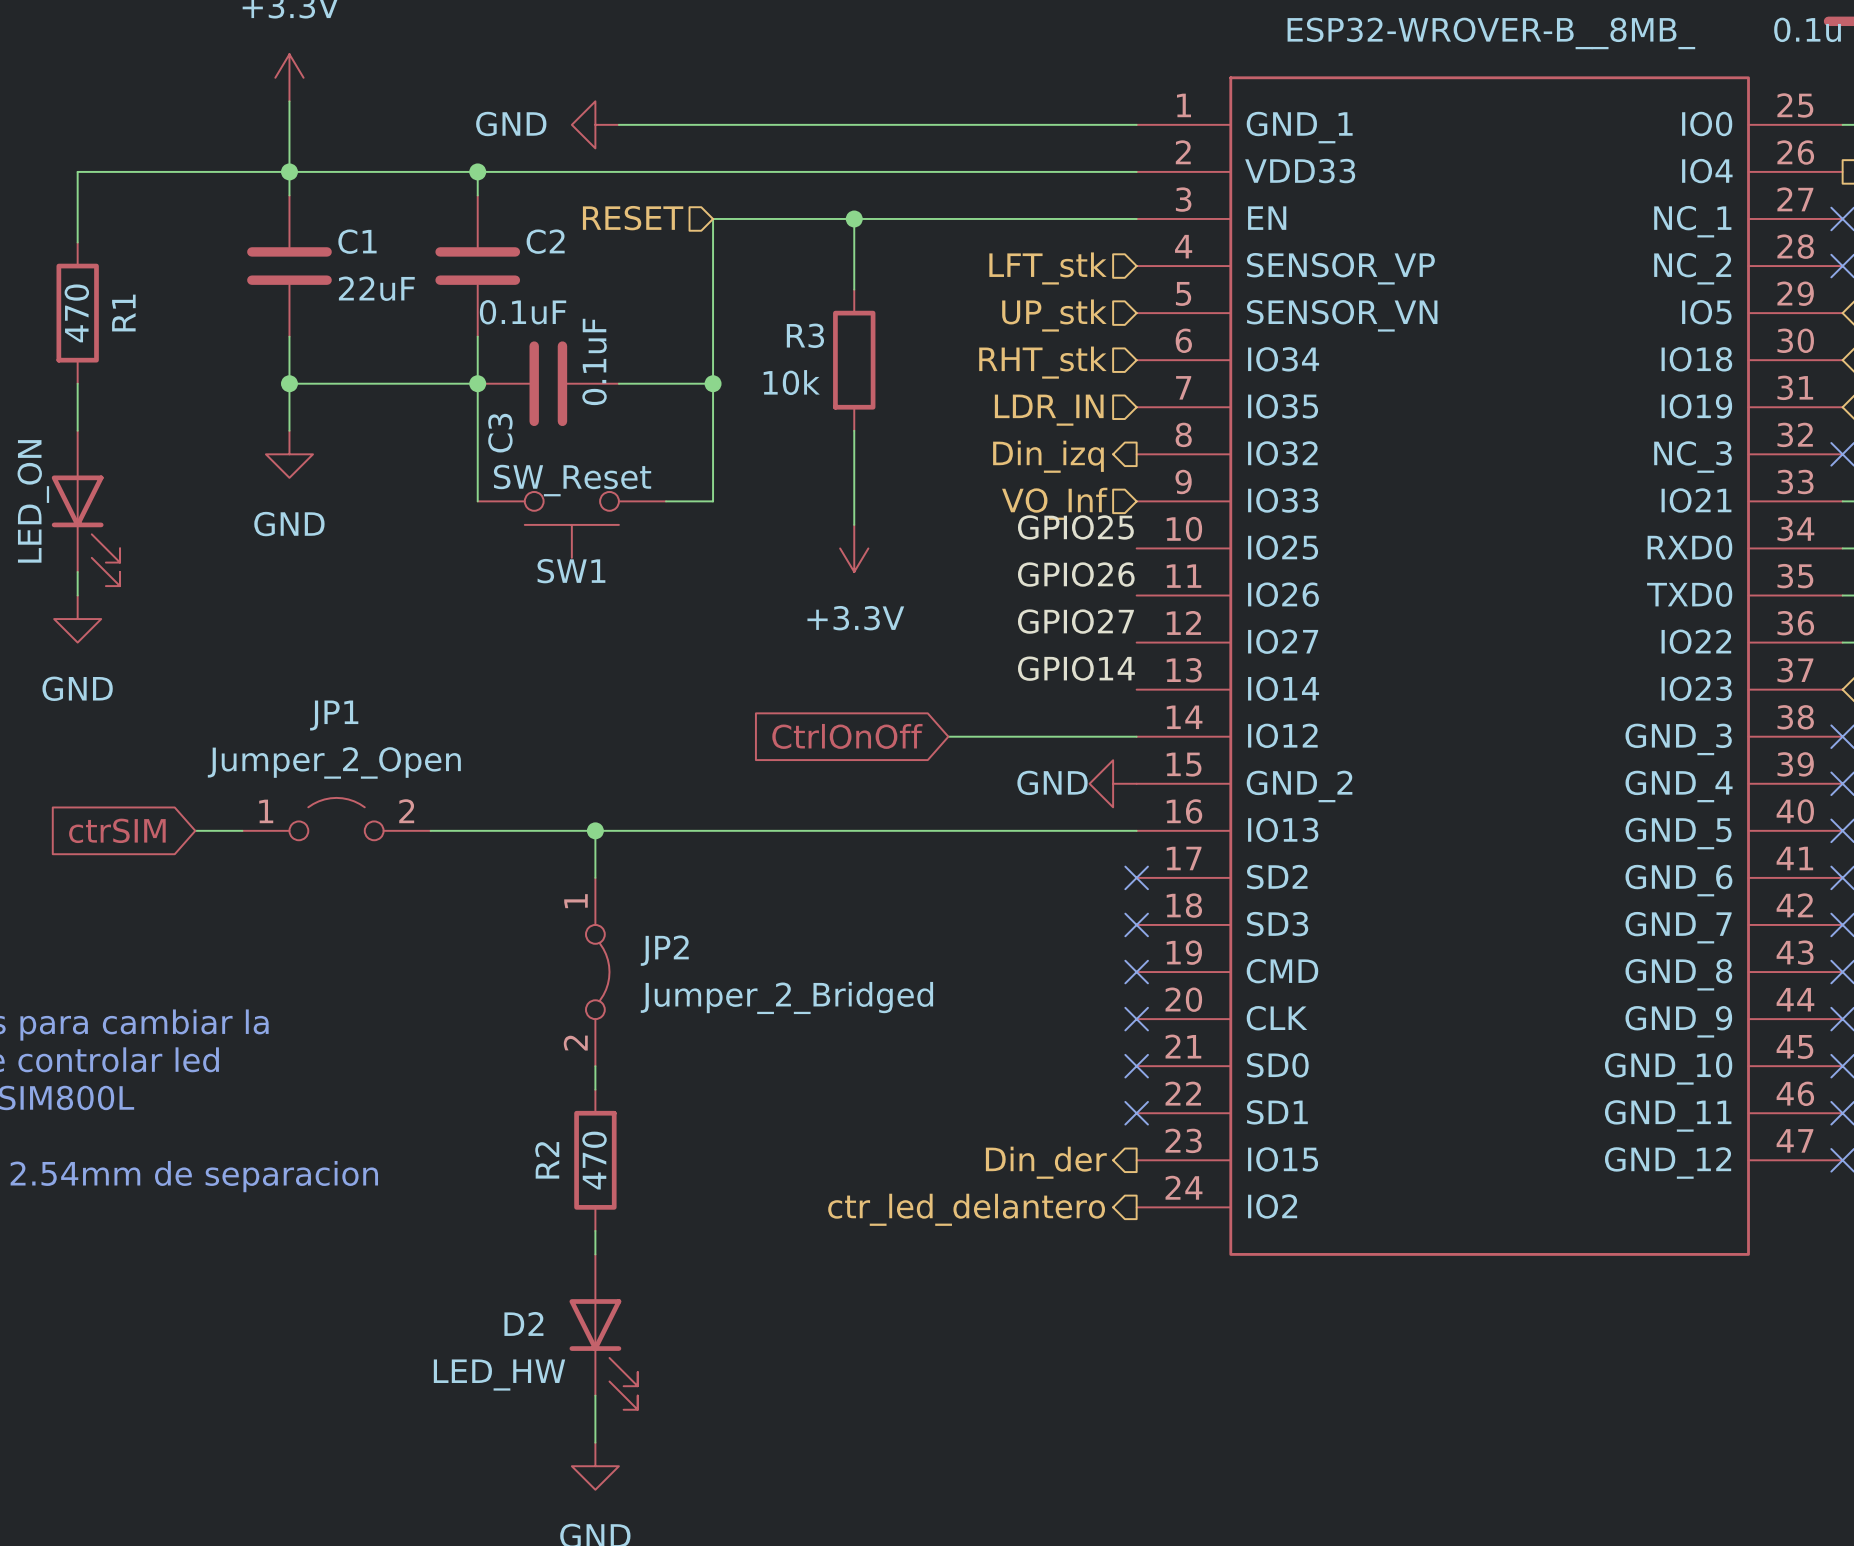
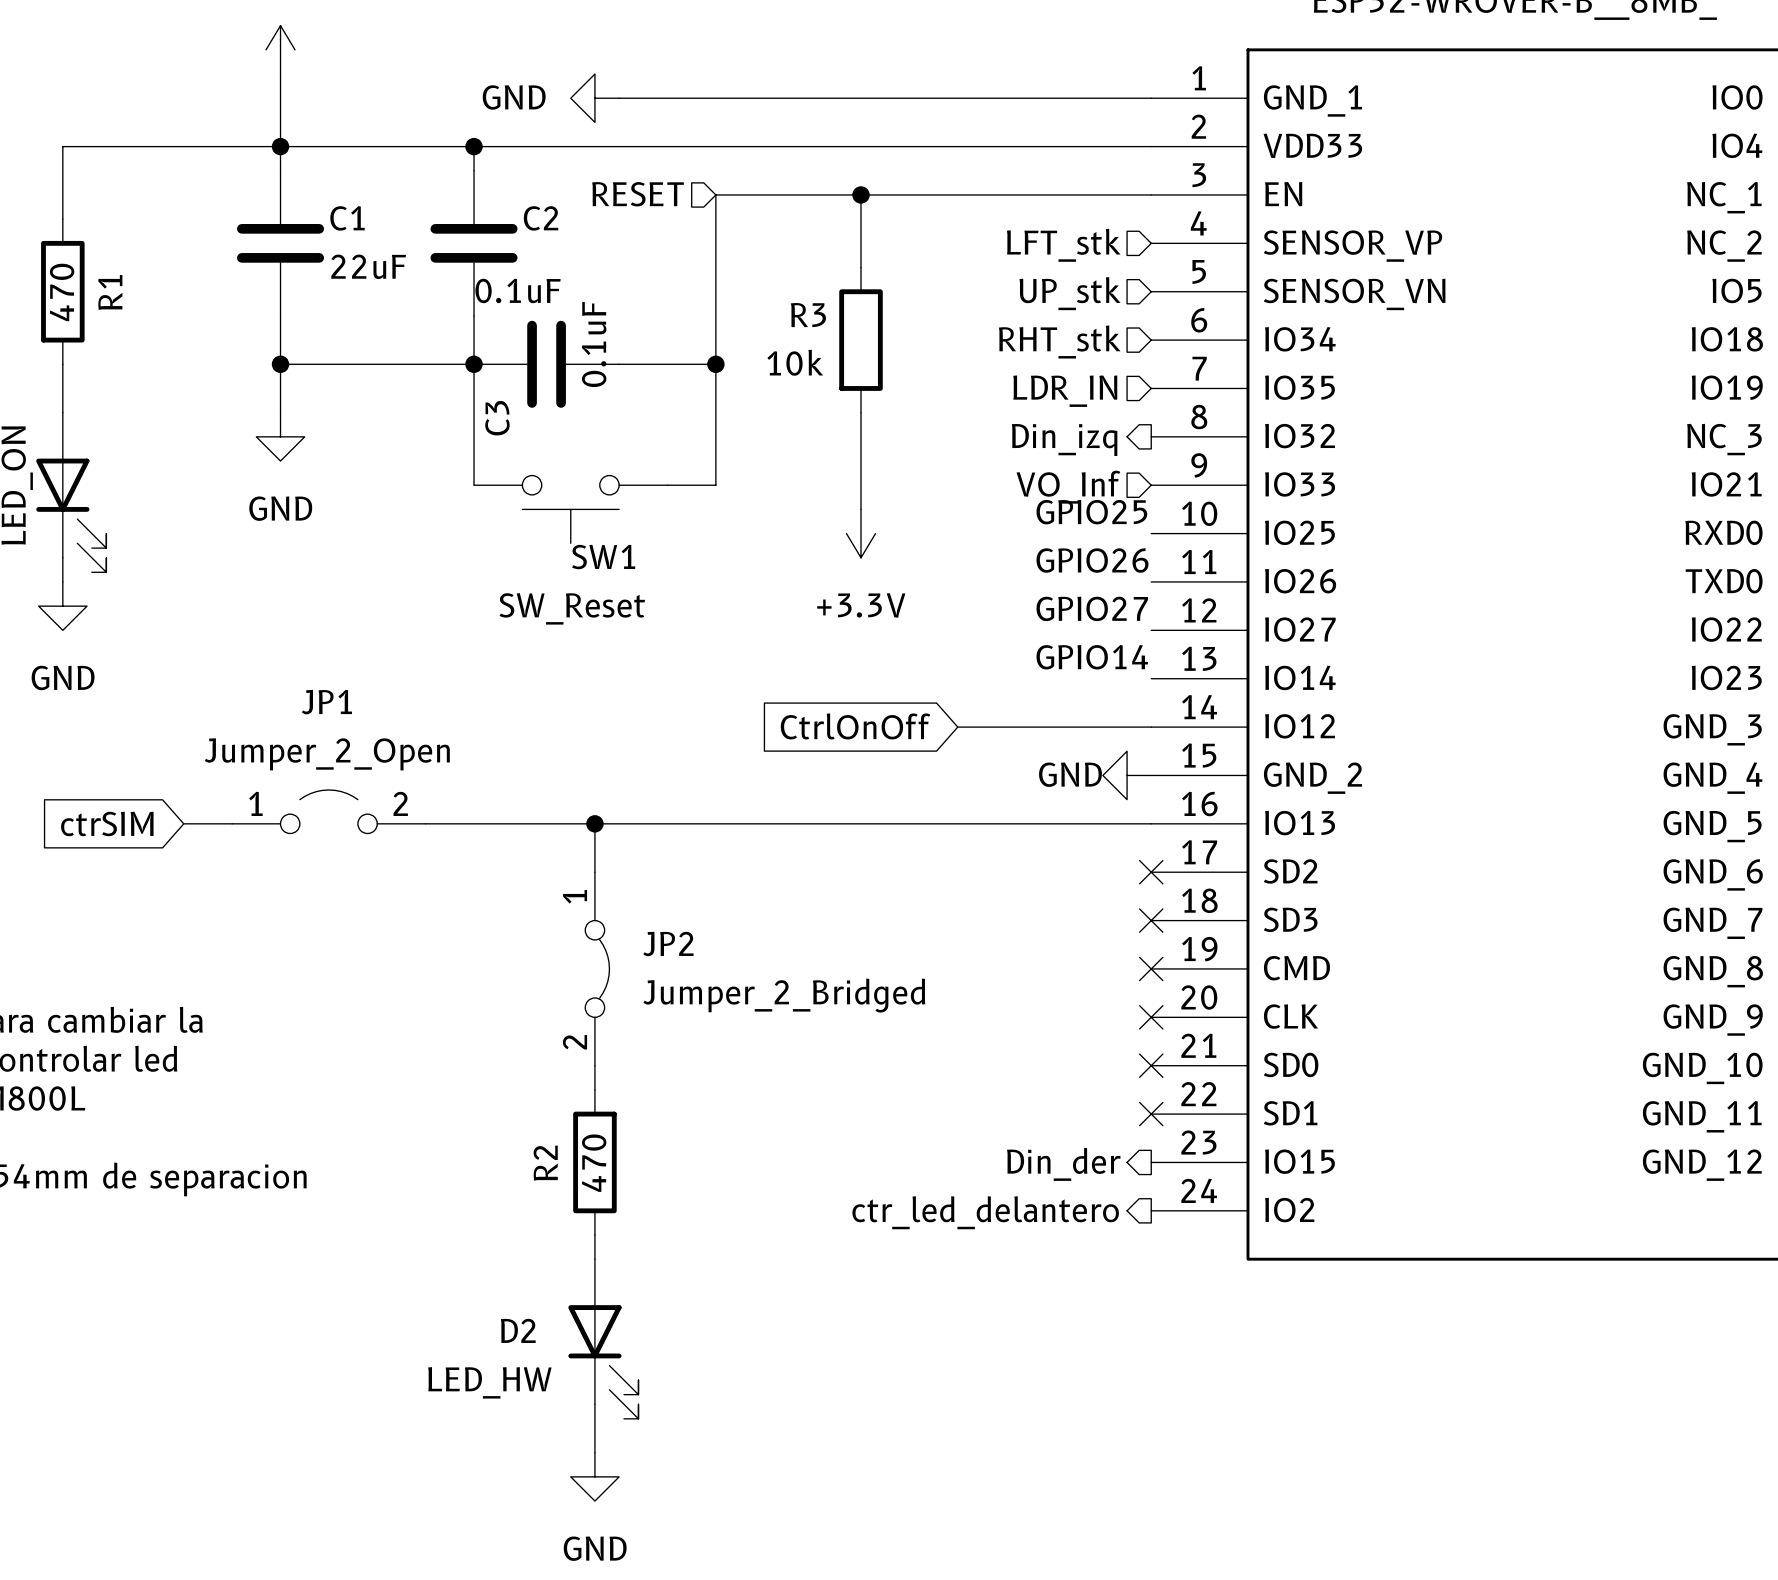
SW1 value position: SW_Reset (572, 480) -> SW_Reset (572, 608)
SW1 name position: SW1 (571, 571) -> SW1 (603, 557)

